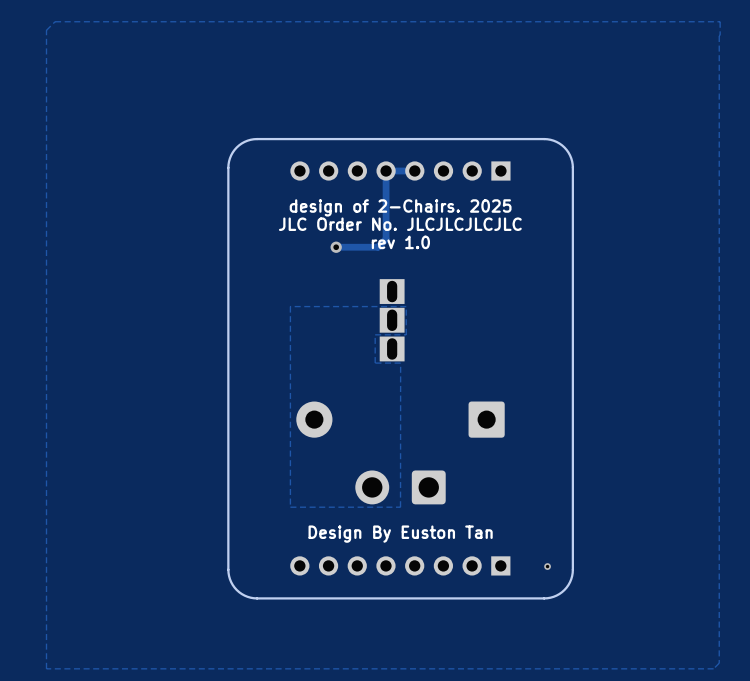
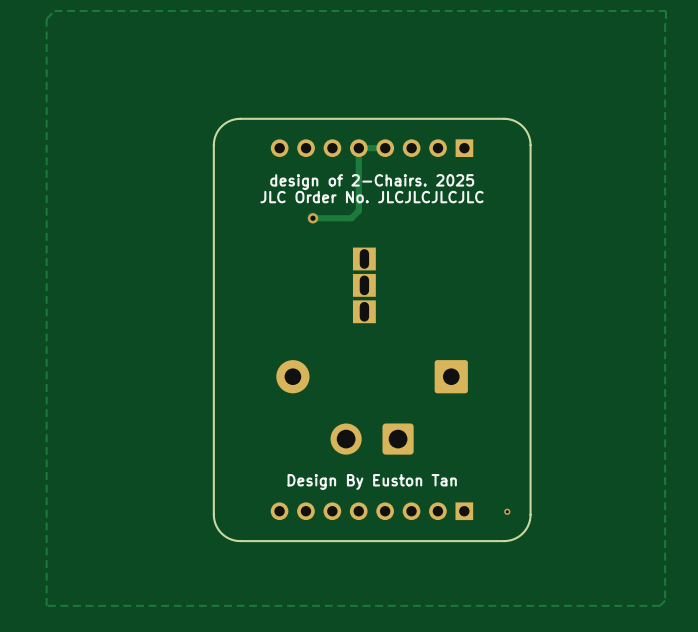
text: rev 1.0 (400, 242) -> none
zone outline: (406, 306) (406, 334) (375, 334) (375, 363) (400, 363) (400, 507) (290, 507) (290, 306) (406, 306) -> none

